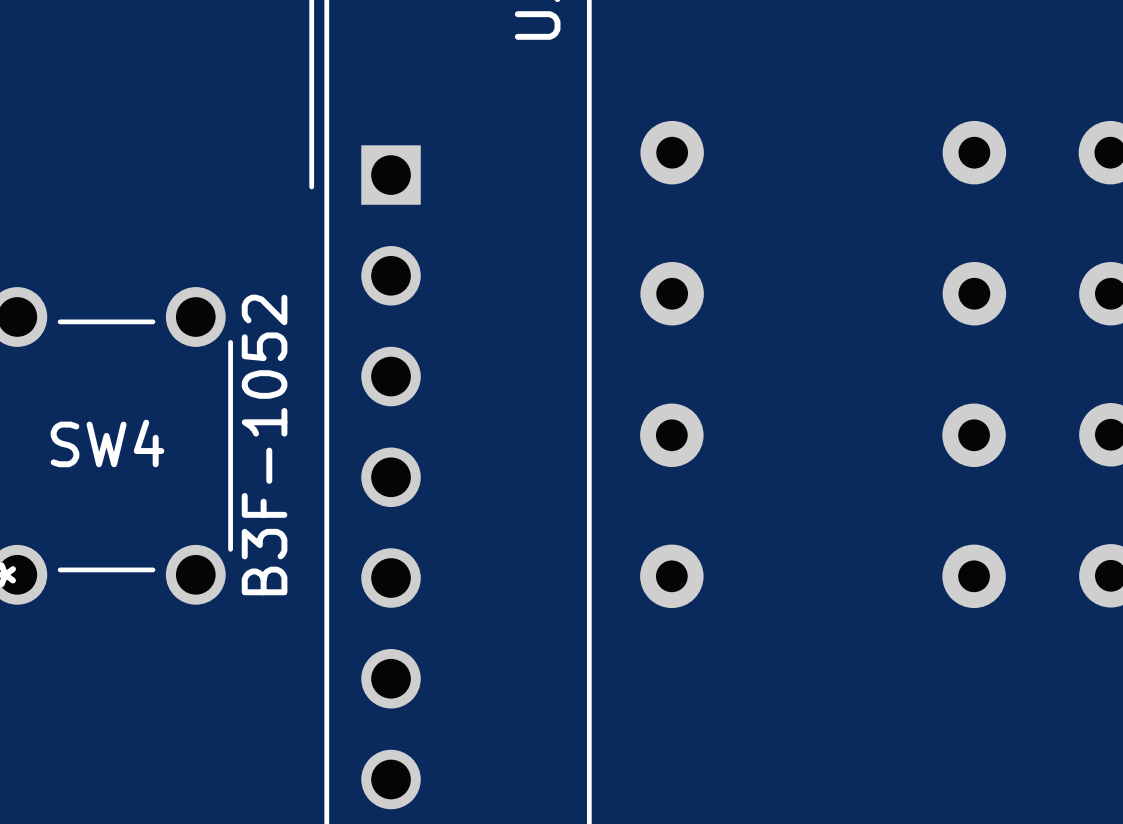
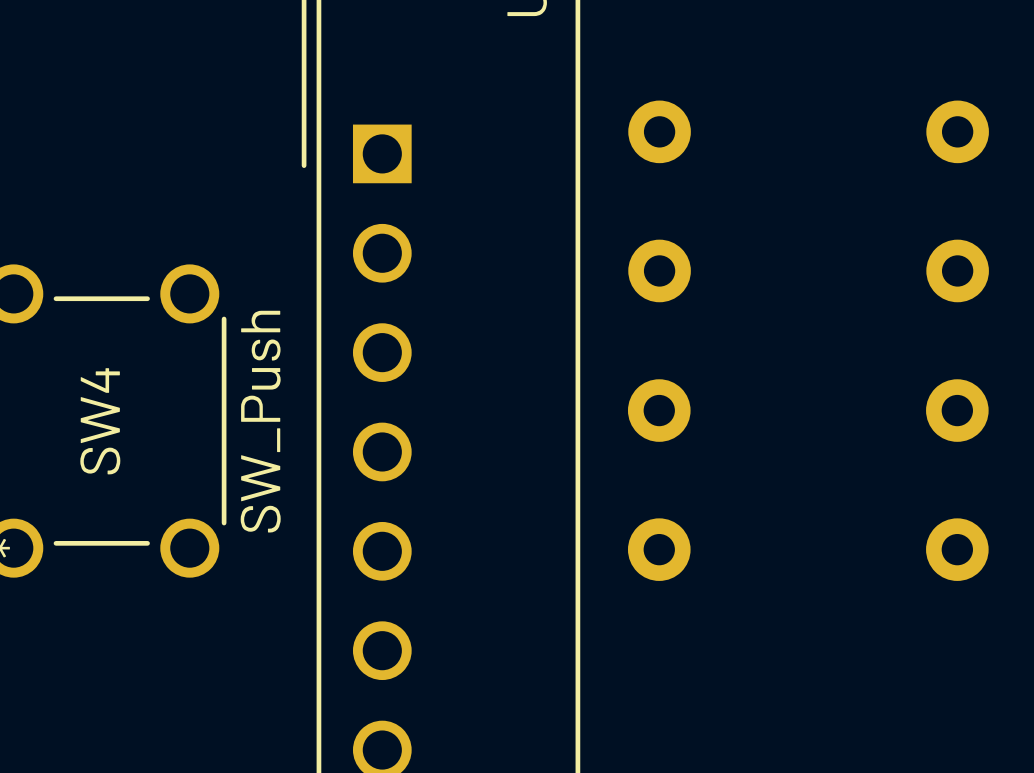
SW4 name rotation: 0° (107, 443) -> 90° counterclockwise (100, 421)
SW4 value: B3F-1052 (264, 444) -> SW_Push (260, 421)

